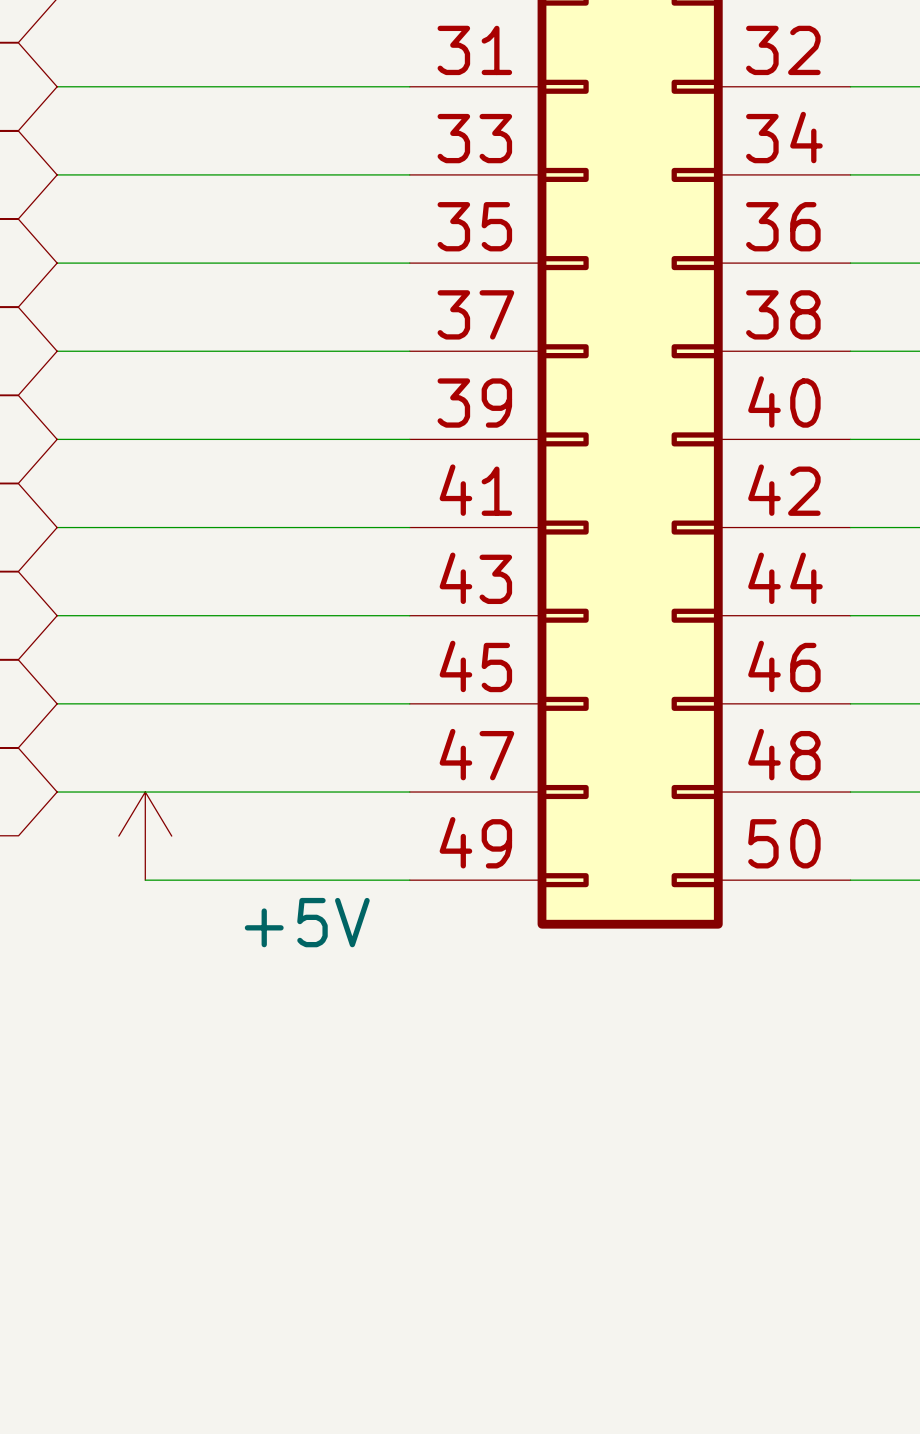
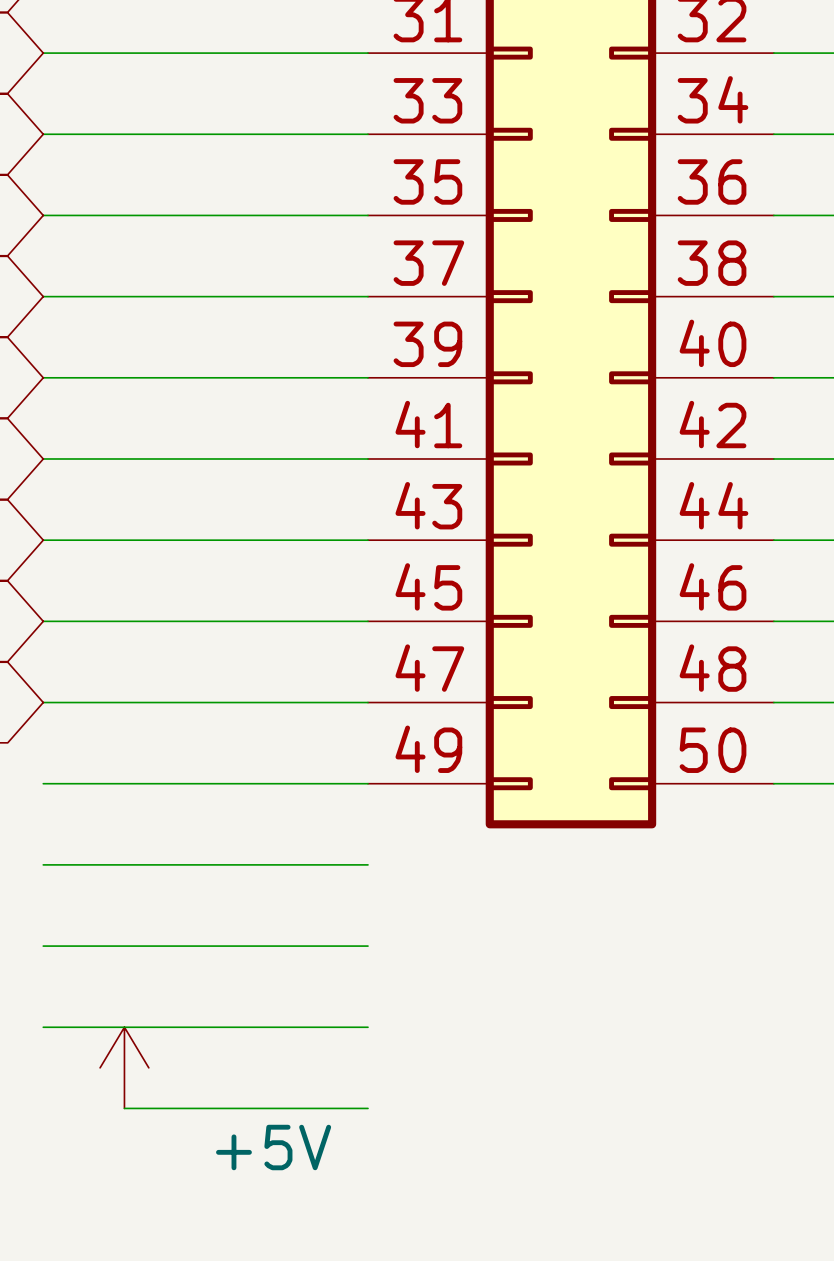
power symbol position: +5V (145, 836) -> +5V (124, 1067)
wire: none -> (43, 783) (124, 783)
wire: none -> (43, 864) (367, 864)
wire: none -> (43, 946) (367, 946)
wire: none -> (43, 1027) (367, 1027)
wire: none -> (124, 1108) (367, 1108)

